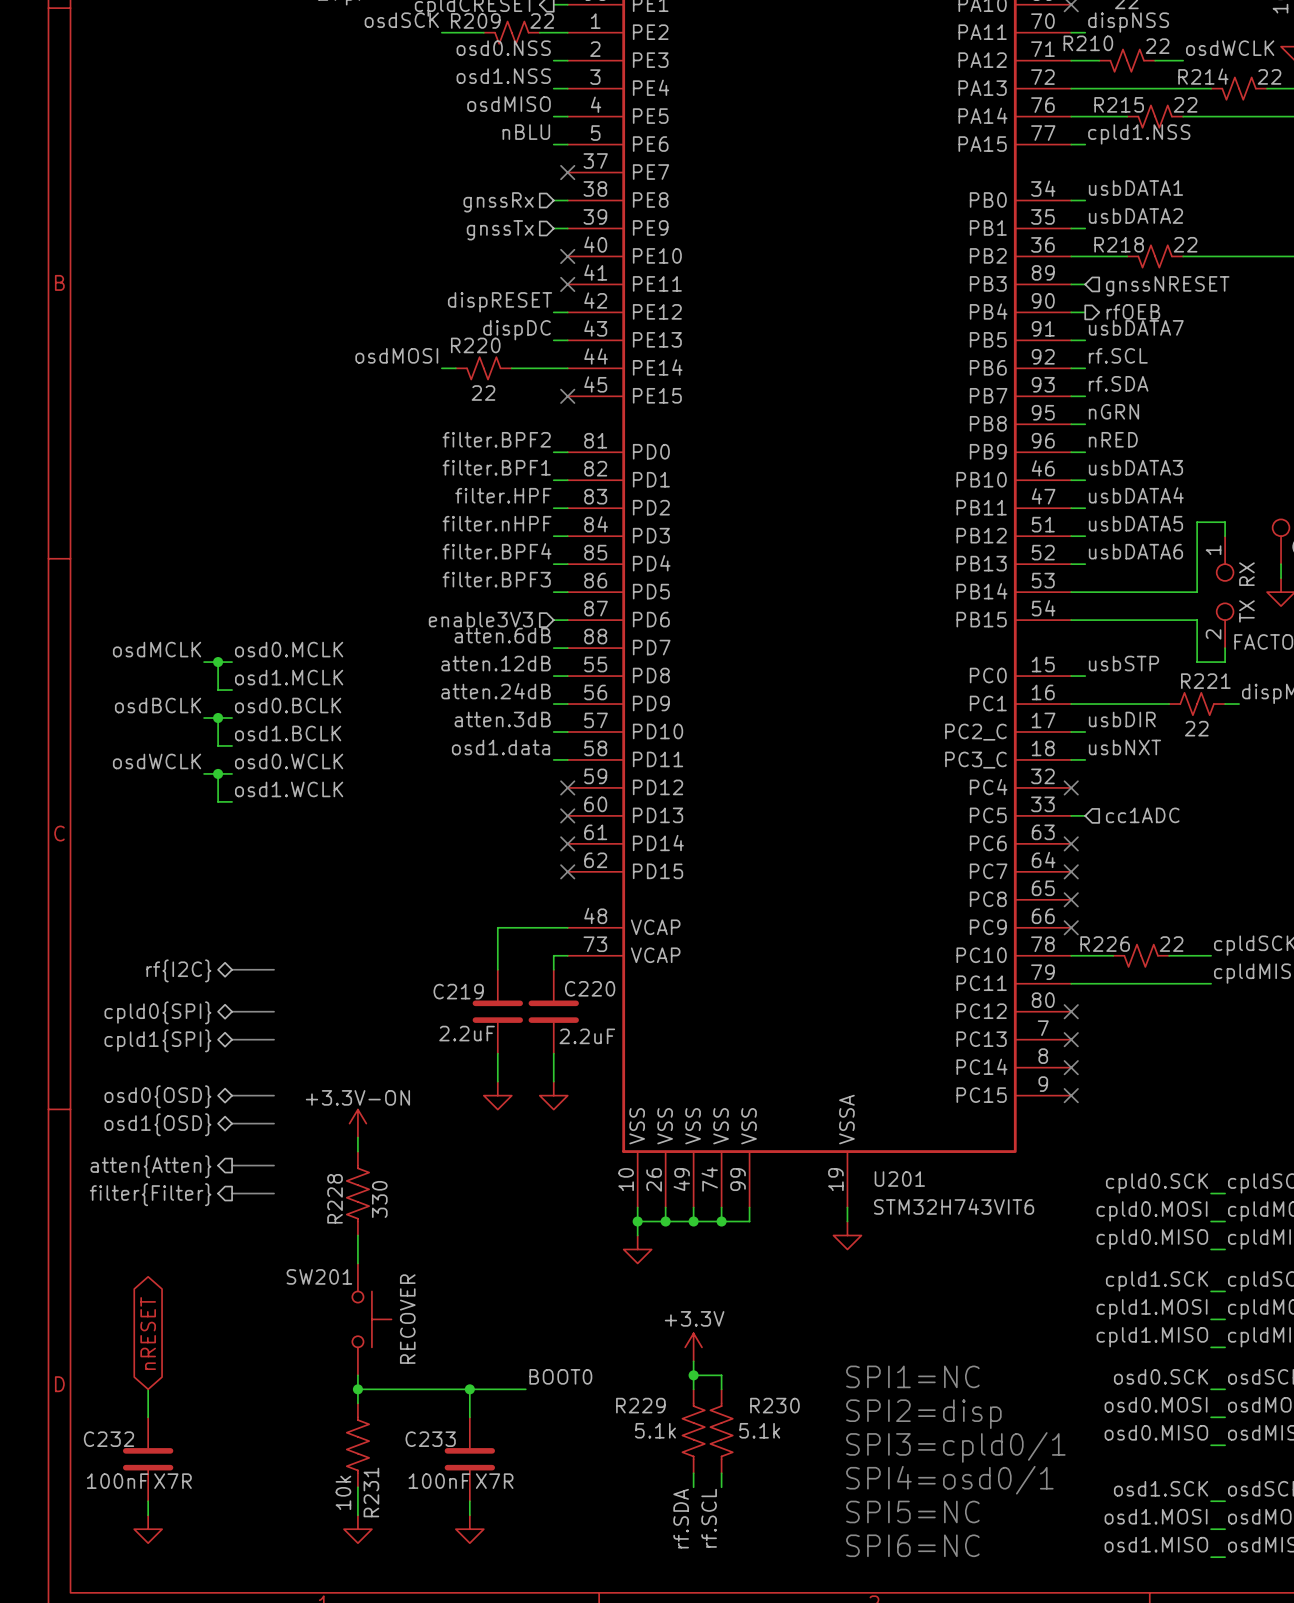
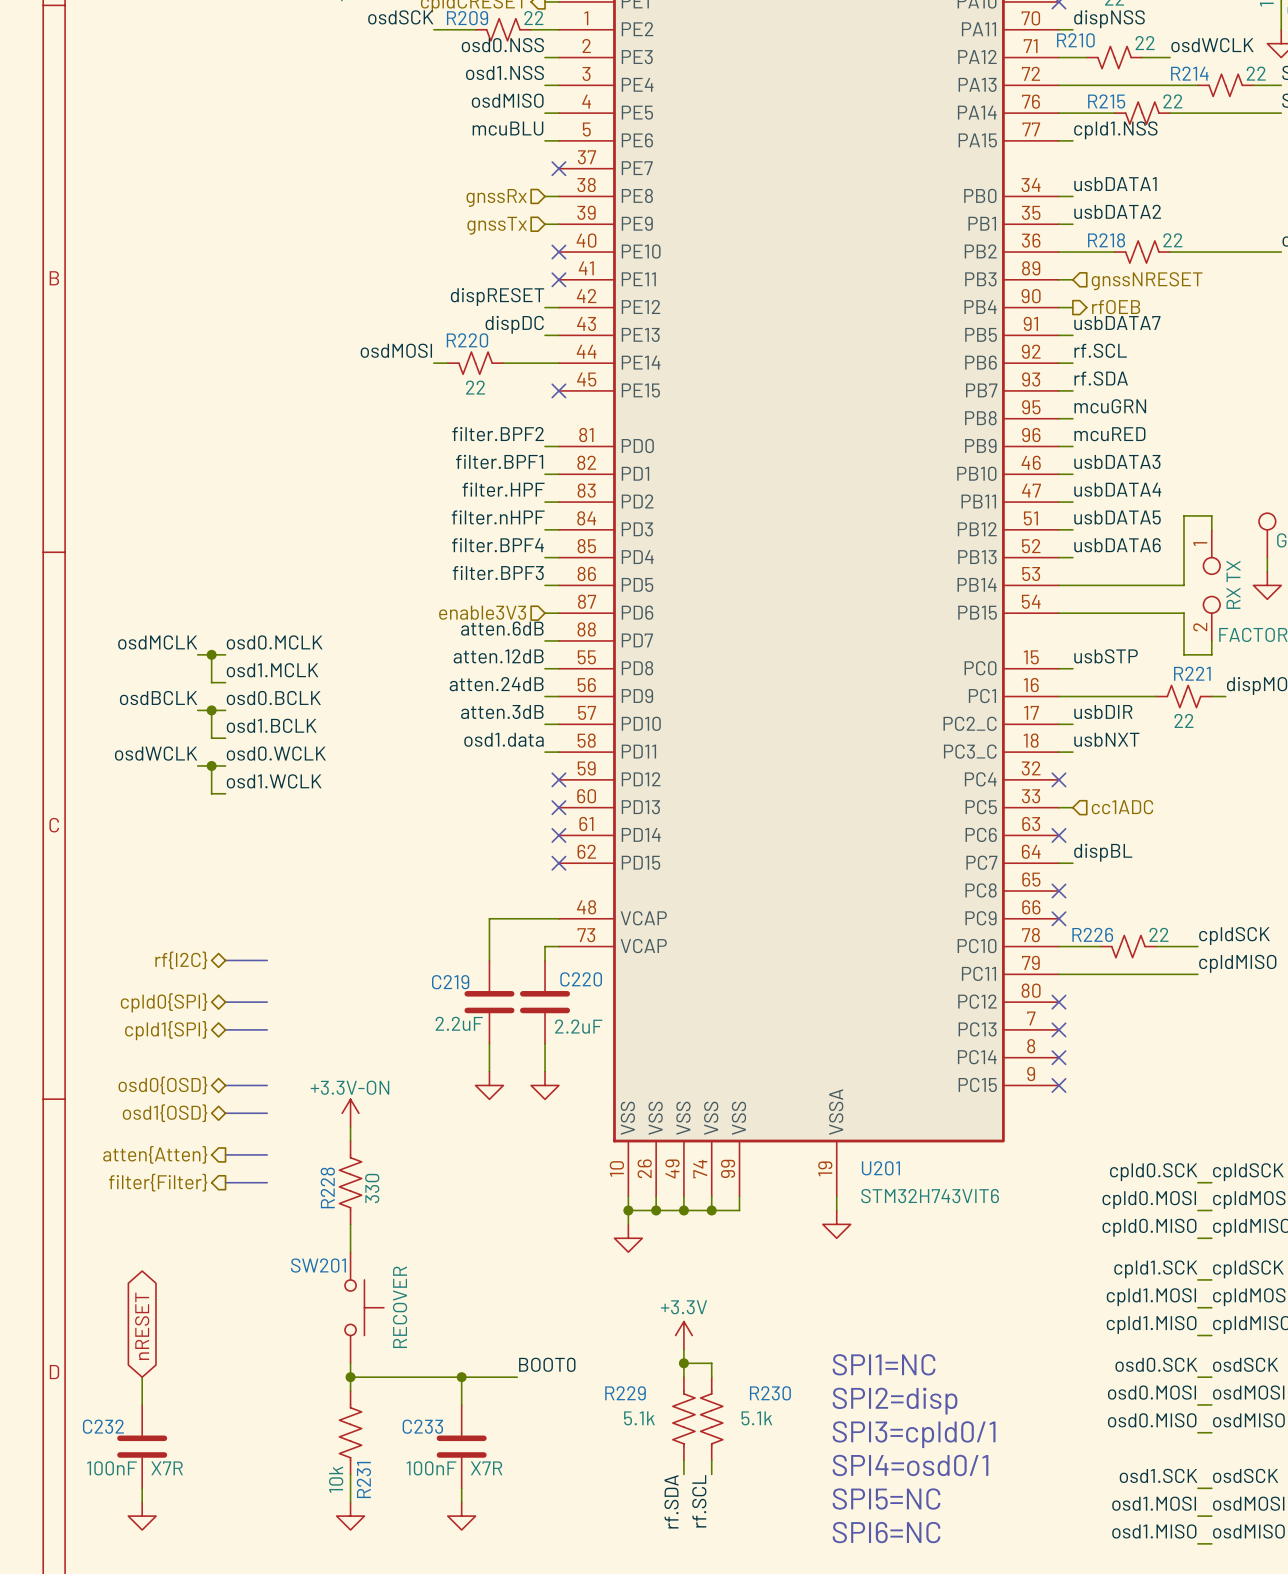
label: nBLU (526, 132) -> mcuBLU (507, 128)
label: nGRN (1113, 411) -> mcuGRN (1110, 406)
label: nRED (1113, 439) -> mcuRED (1109, 434)
part text: TX RX (1246, 592) -> RX TX (1233, 584)
label: none -> dispBL (1103, 852)
wire: none -> (1058, 863) (1072, 863)
no-connect mark: (1071, 871) -> none

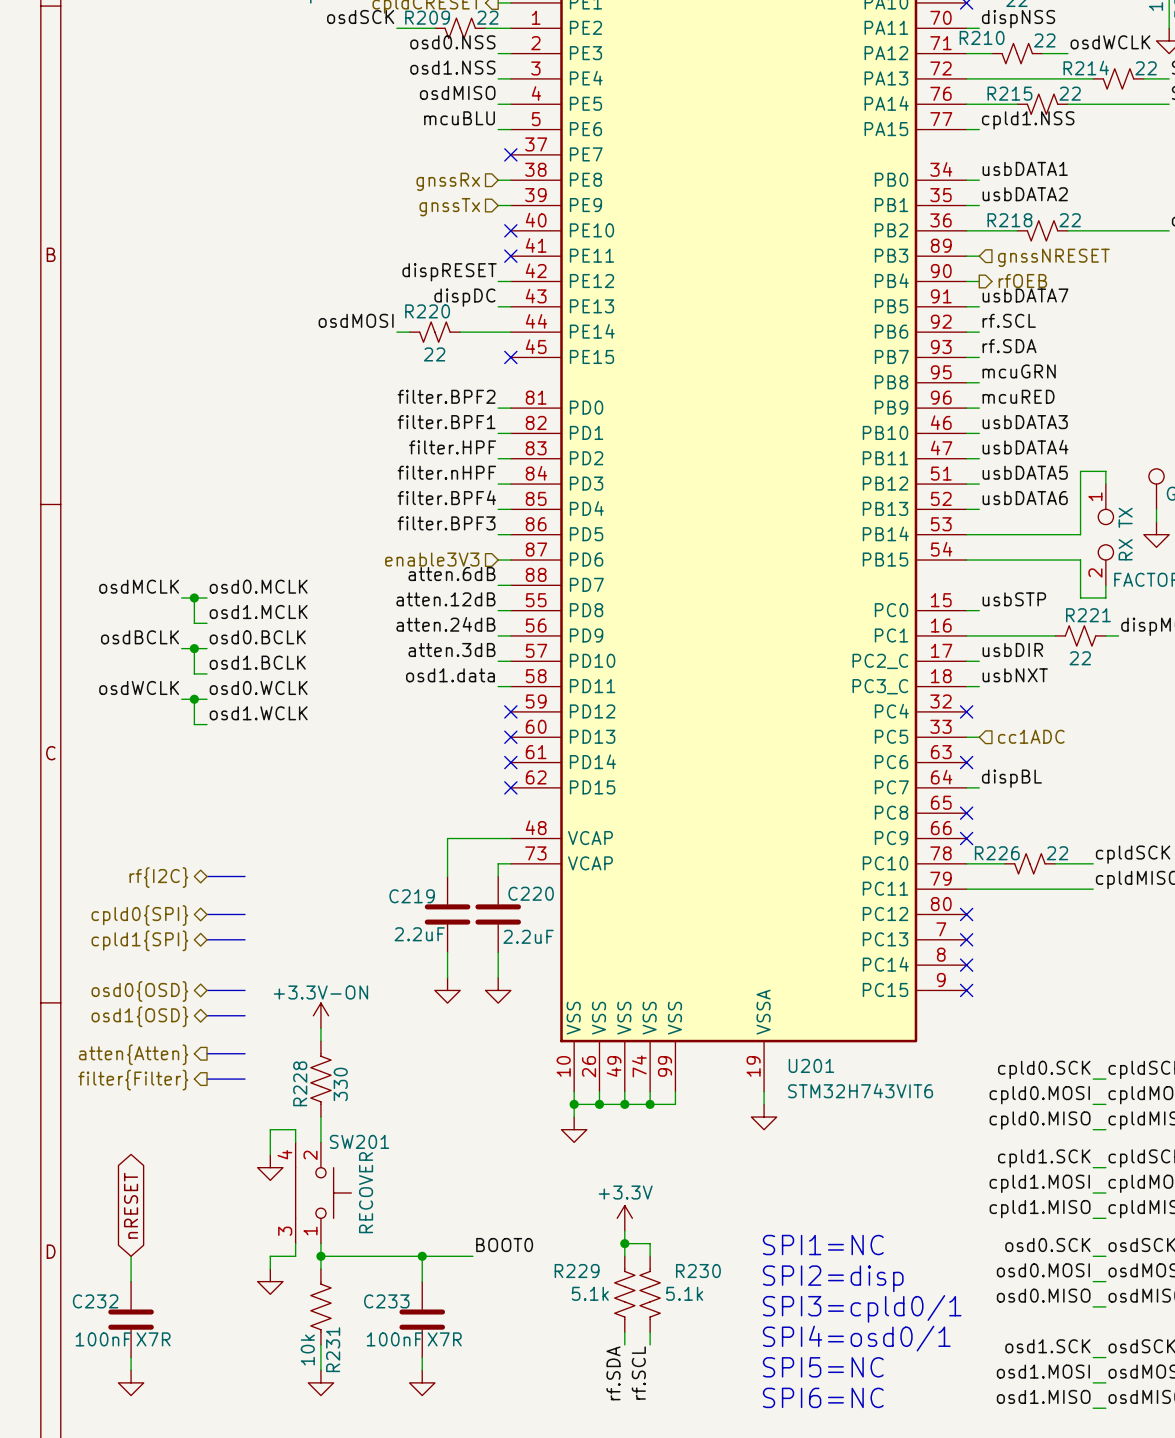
wire: none -> (295, 1142) (295, 1129) (270, 1129) (270, 1155)
SW201 symbol: [344, 1252, 384, 1364] -> [295, 1142, 352, 1244]
SW201 name position: SW201 (318, 1265) -> SW201 (359, 1141)
power symbol: none -> (270, 1167)
wire: none -> (295, 1243) (295, 1256) (270, 1256) (270, 1268)
power symbol: none -> (270, 1281)

